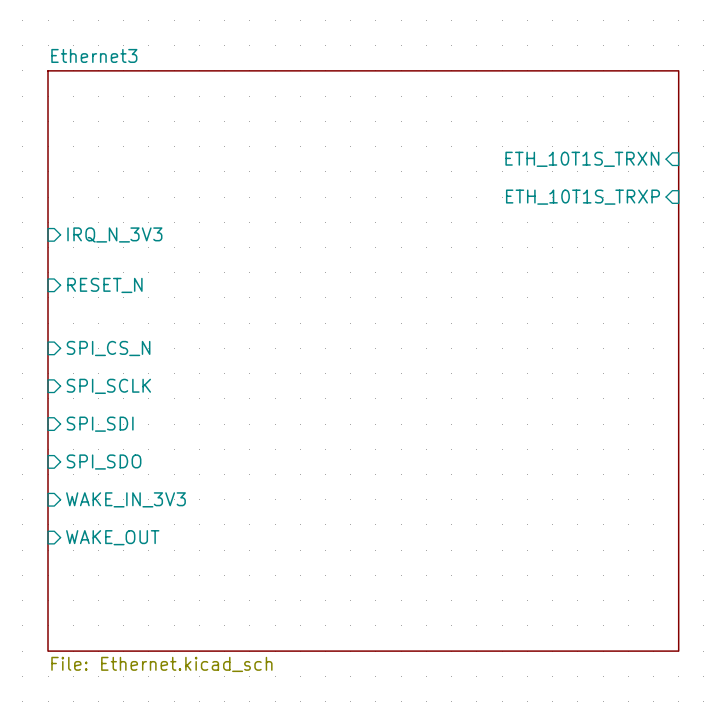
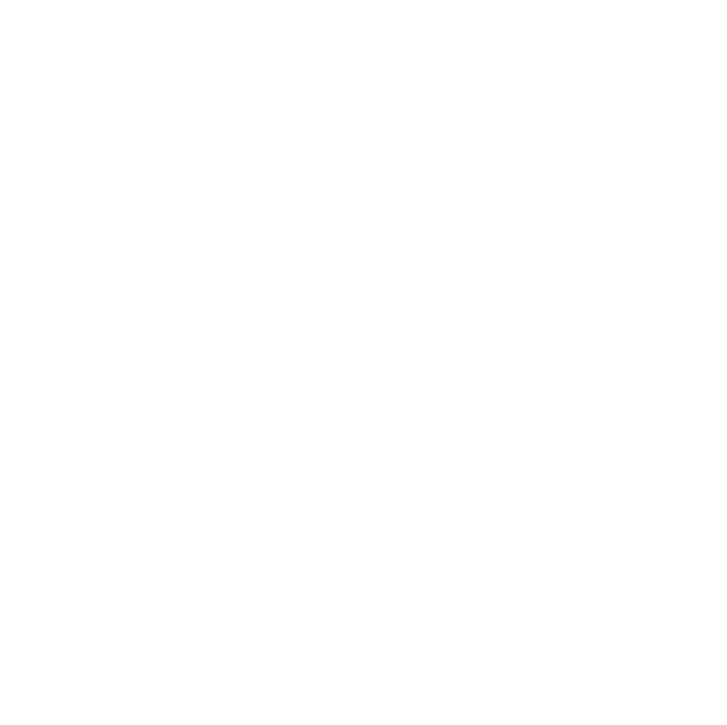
sheet pin: ETH_10T1S_TRXN (582, 159) -> none
sheet pin: ETH_10T1S_TRXP (582, 197) -> none
sheet pin: IRQ_N_3V3 (114, 234) -> none
sheet pin: RESET_N (104, 285) -> none
sheet pin: SPI_CS_N (108, 348) -> none
sheet Ethernet3: File: Ethernet.kicad_sch (363, 360) -> none
sheet pin: SPI_SCLK (108, 386) -> none
sheet pin: SPI_SDI (100, 424) -> none
sheet pin: SPI_SDO (104, 462) -> none
sheet pin: WAKE_IN_3V3 (125, 499) -> none
sheet pin: WAKE_OUT (112, 537) -> none

